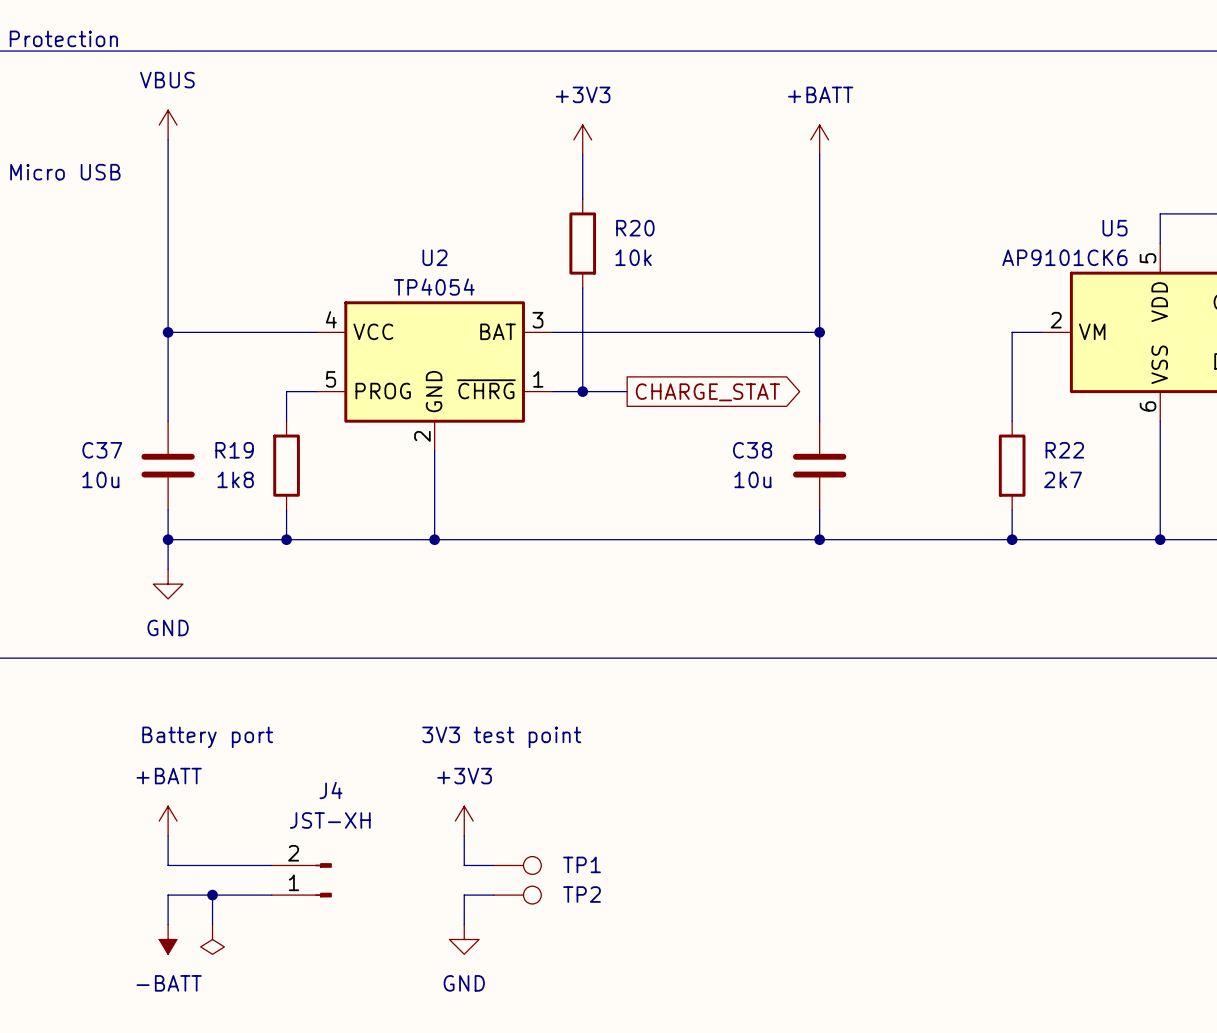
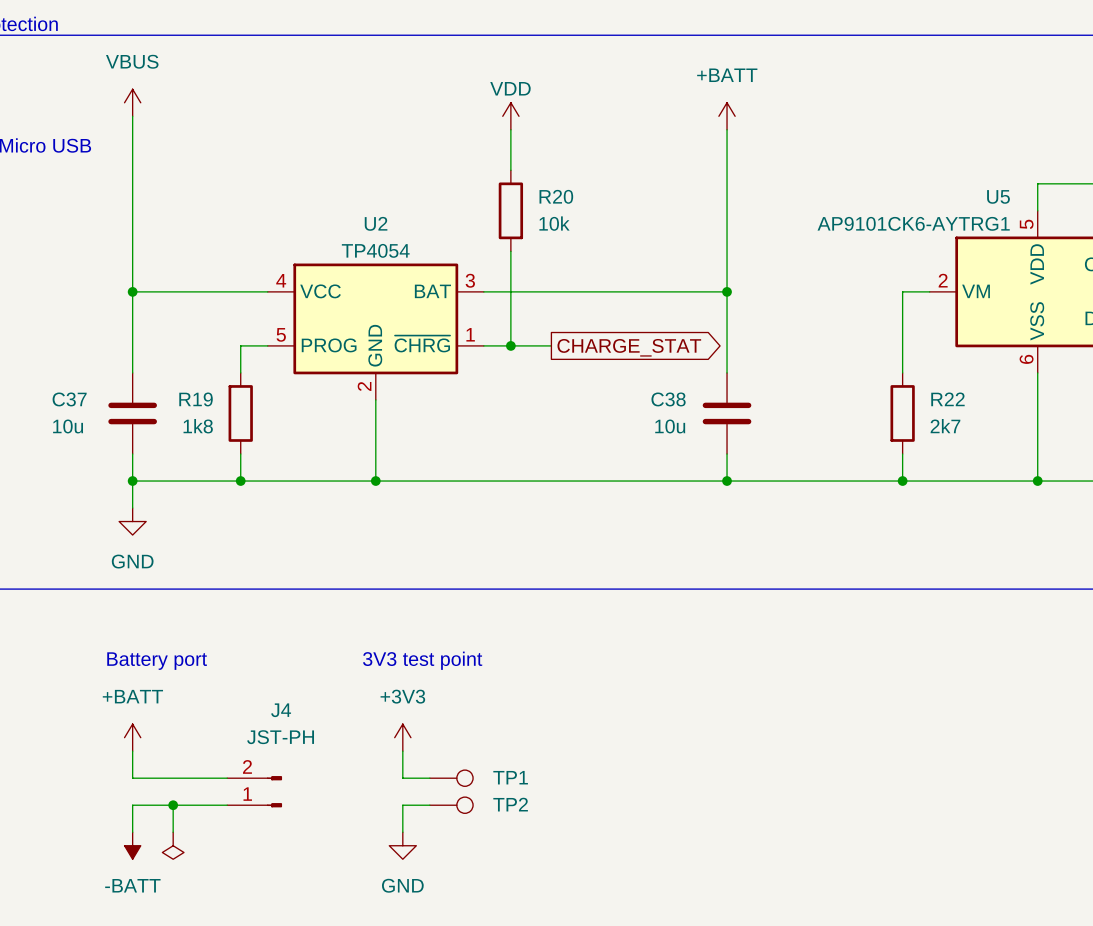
power symbol: +3V3 (582, 139) -> VDD (510, 116)
U5 value: AP9101CK6 (1064, 257) -> AP9101CK6-AYTRG1 (913, 223)
J4 value: JST-XH (330, 820) -> JST-PH (280, 737)

